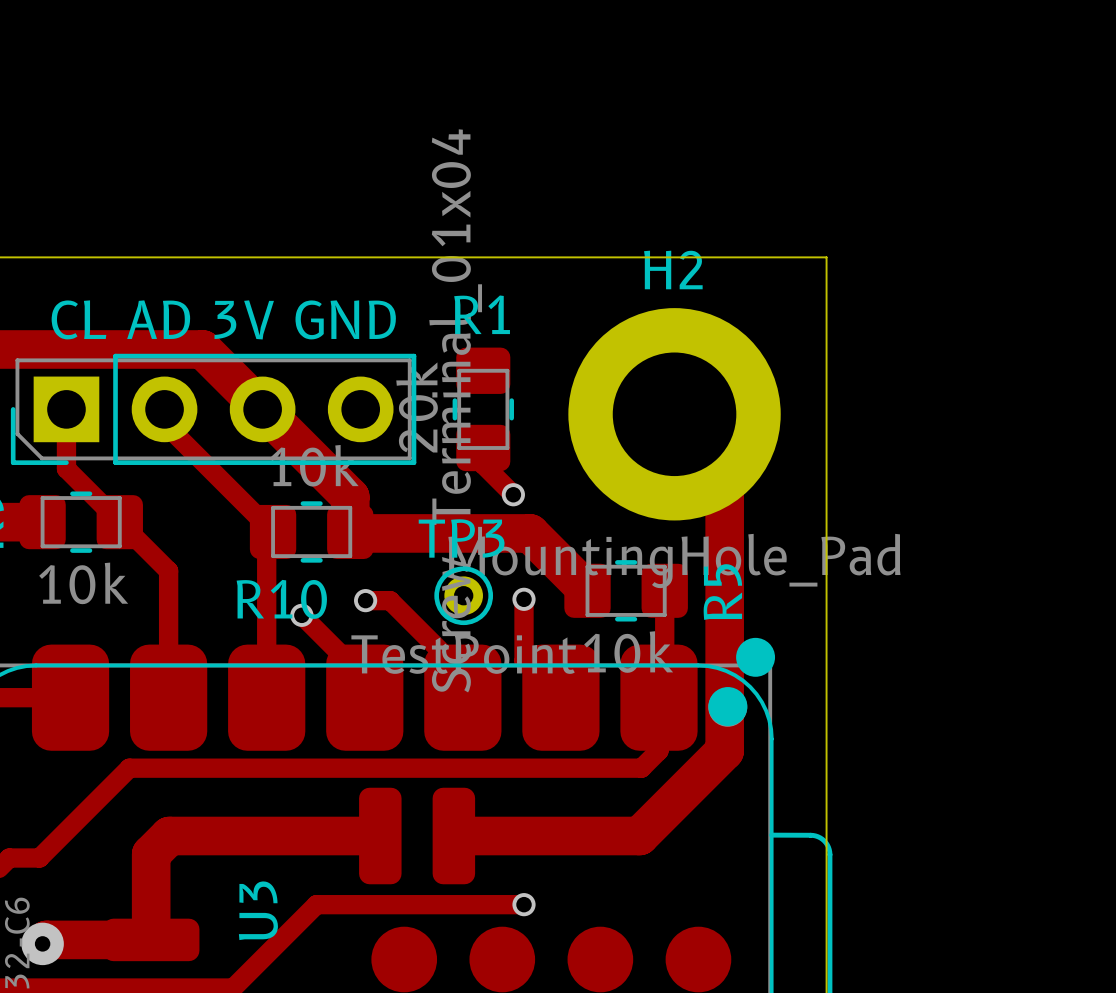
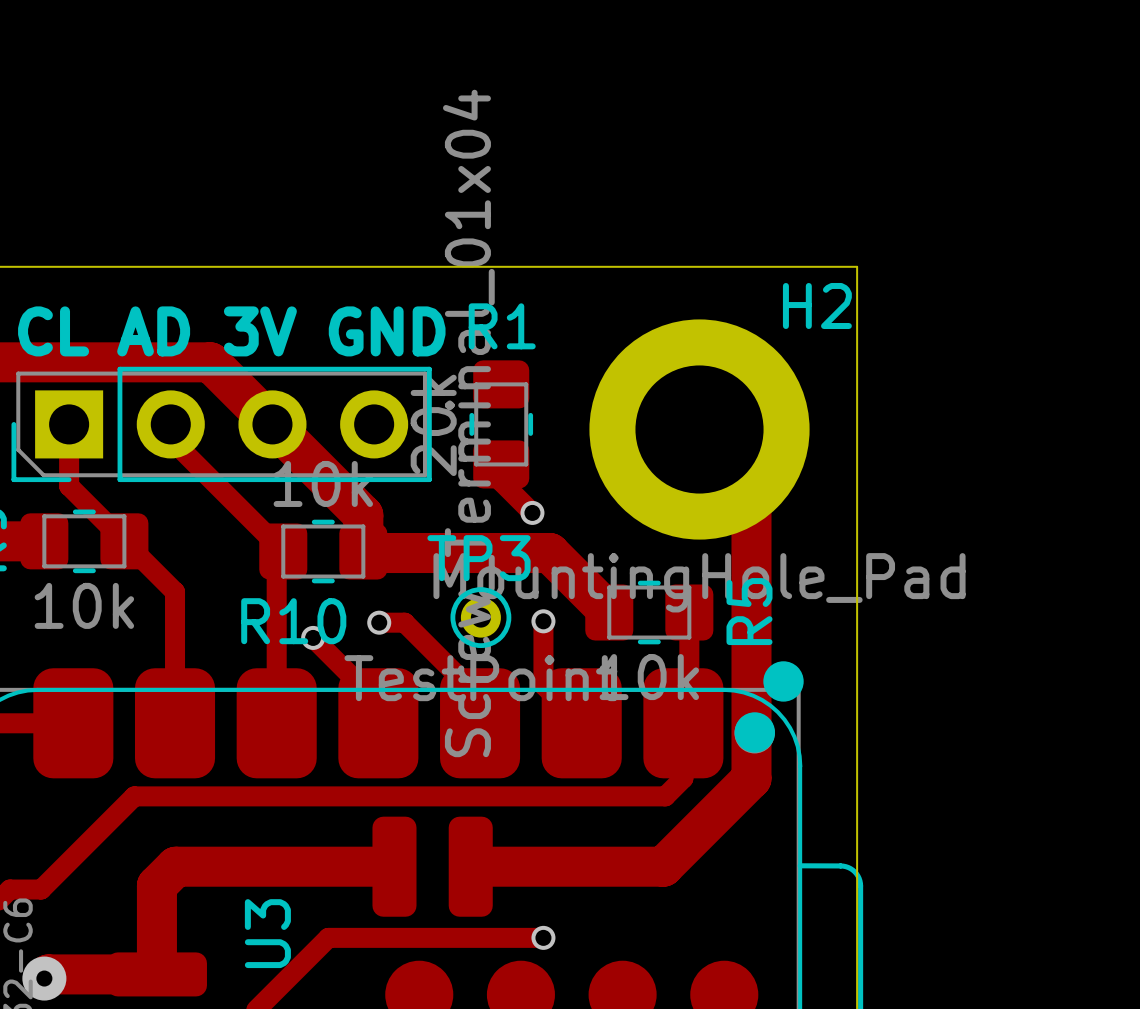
H2 name position: H2 (673, 269) -> H2 (817, 305)

